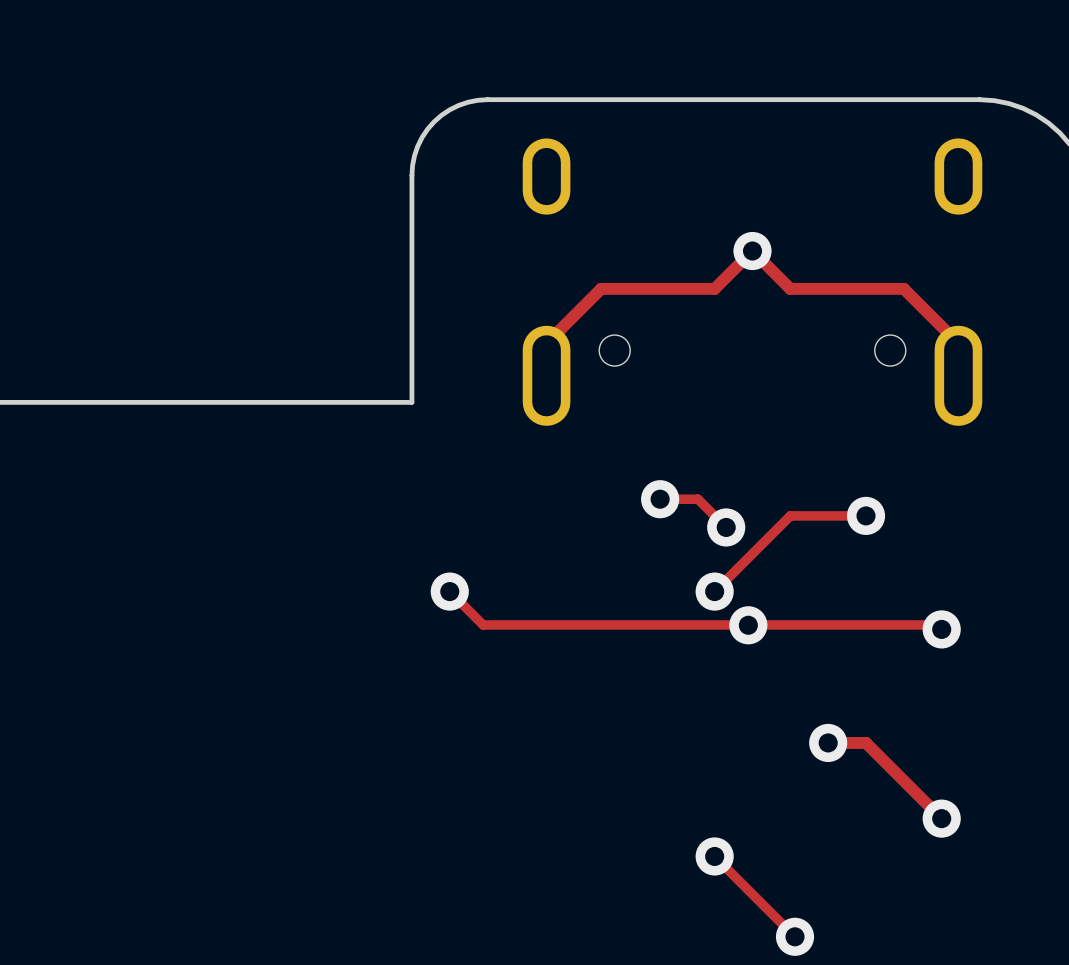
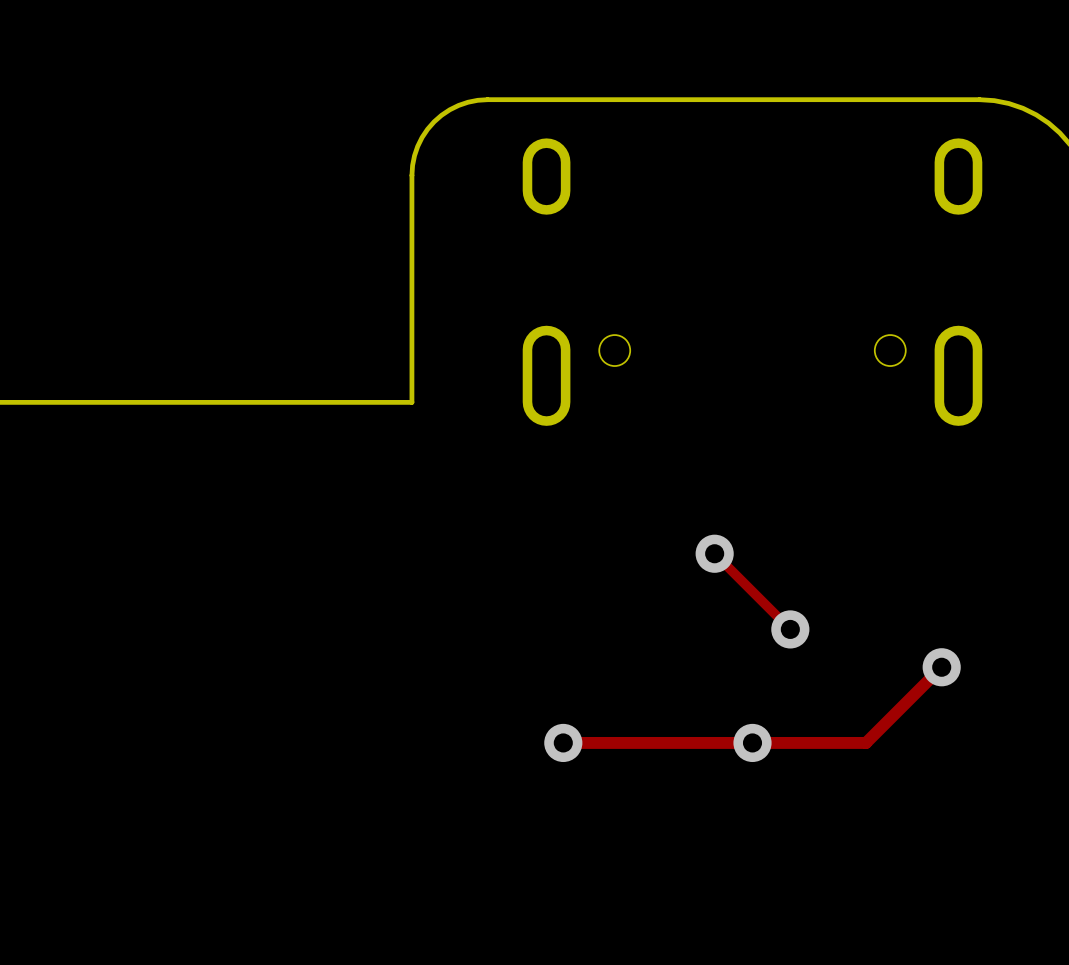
via: (752, 251) -> none
track: (546, 375) (546, 343) (601, 288) (714, 288) (752, 251) (790, 288) (903, 288) (958, 343) (958, 375) -> none
track: (660, 499) (697, 499) (726, 527) -> none
via: (660, 499) -> none
track: (866, 515) (790, 515) (714, 591) -> none
via: (866, 515) -> none
via: (726, 527) -> none
track: none -> (714, 553) (790, 629)
via: none -> (714, 553)
track: (449, 591) (483, 624) (937, 624) (941, 629) -> none
via: (449, 591) -> none
via: (714, 591) -> none
via: (748, 625) -> none
via: none -> (790, 629)
via position: (941, 629) -> (941, 667)
track: none -> (563, 742) (828, 742)
via: none -> (563, 742)
via: none -> (752, 742)
via: (828, 742) -> none
track: (866, 742) (941, 818) -> (866, 742) (941, 667)
via: (941, 818) -> none
track: (714, 856) (795, 936) -> none
via: (714, 856) -> none
via: (795, 936) -> none

